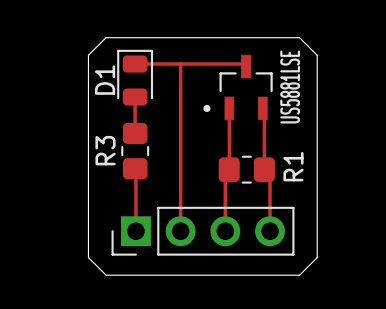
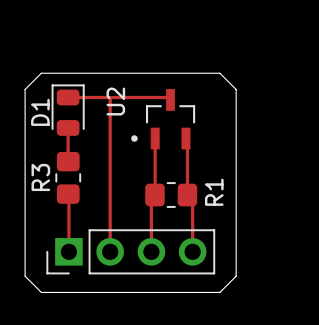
US5881LSE name: US5881LSE (290, 86) -> U2 (115, 101)

